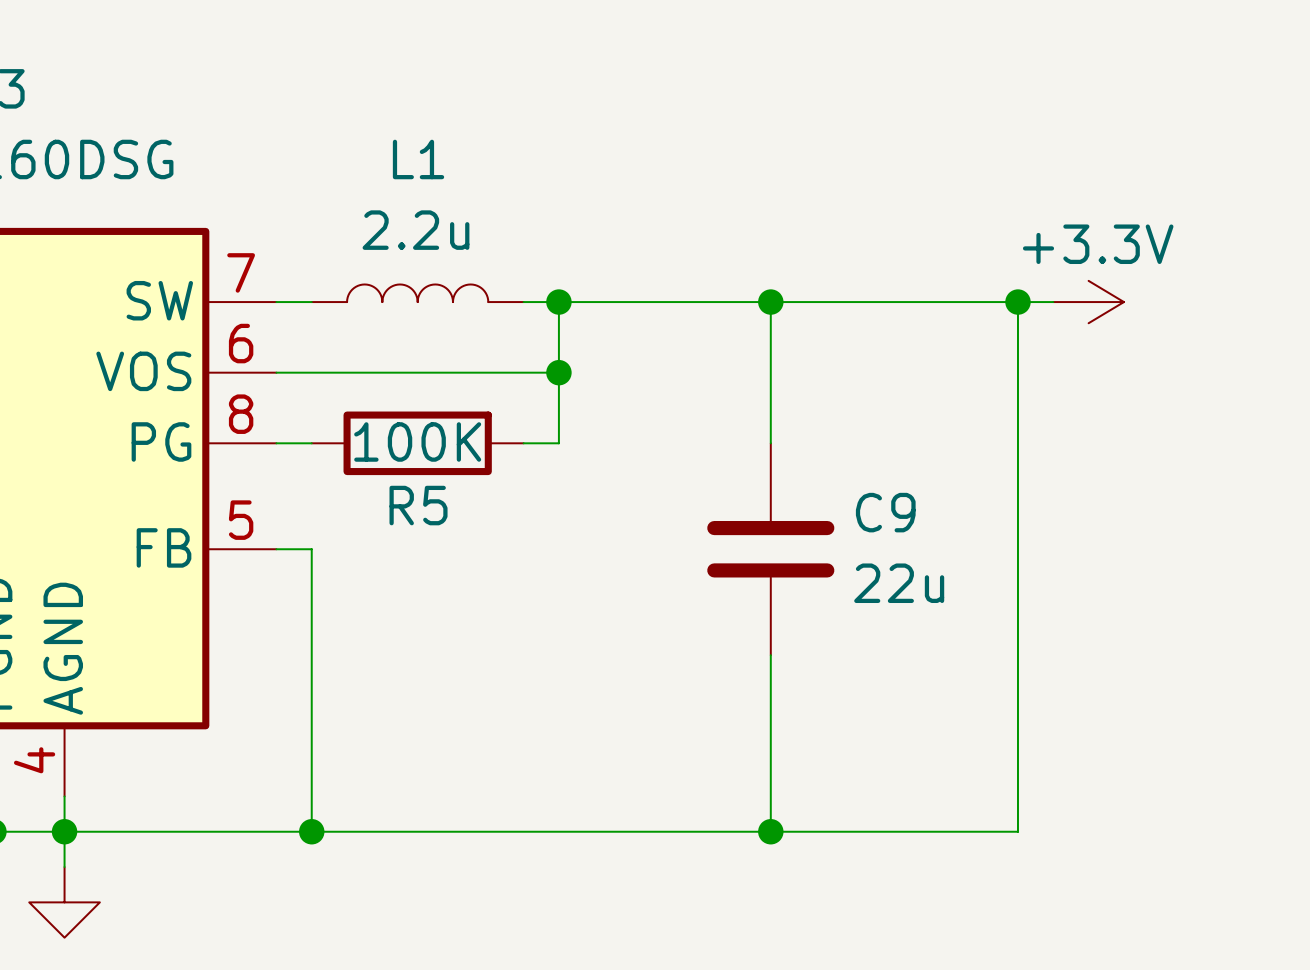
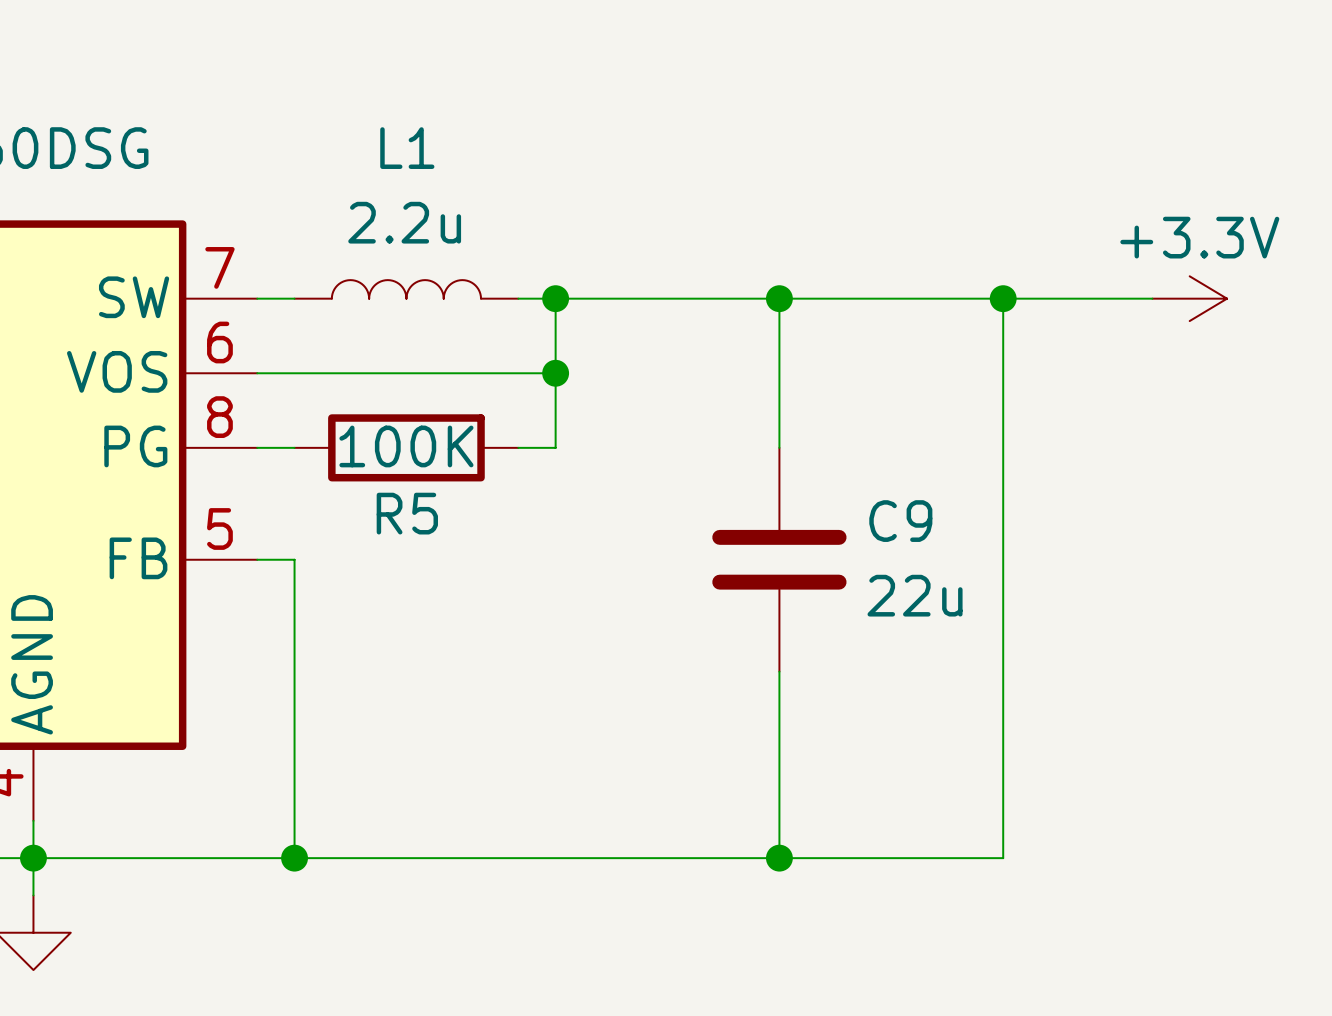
wire: (1017, 302) (1017, 831) (982, 831) -> (1003, 298) (1003, 858)
junction position: (1017, 302) -> (1003, 298)
power symbol position: +3.3V (1088, 302) -> +3.3V (1189, 298)

